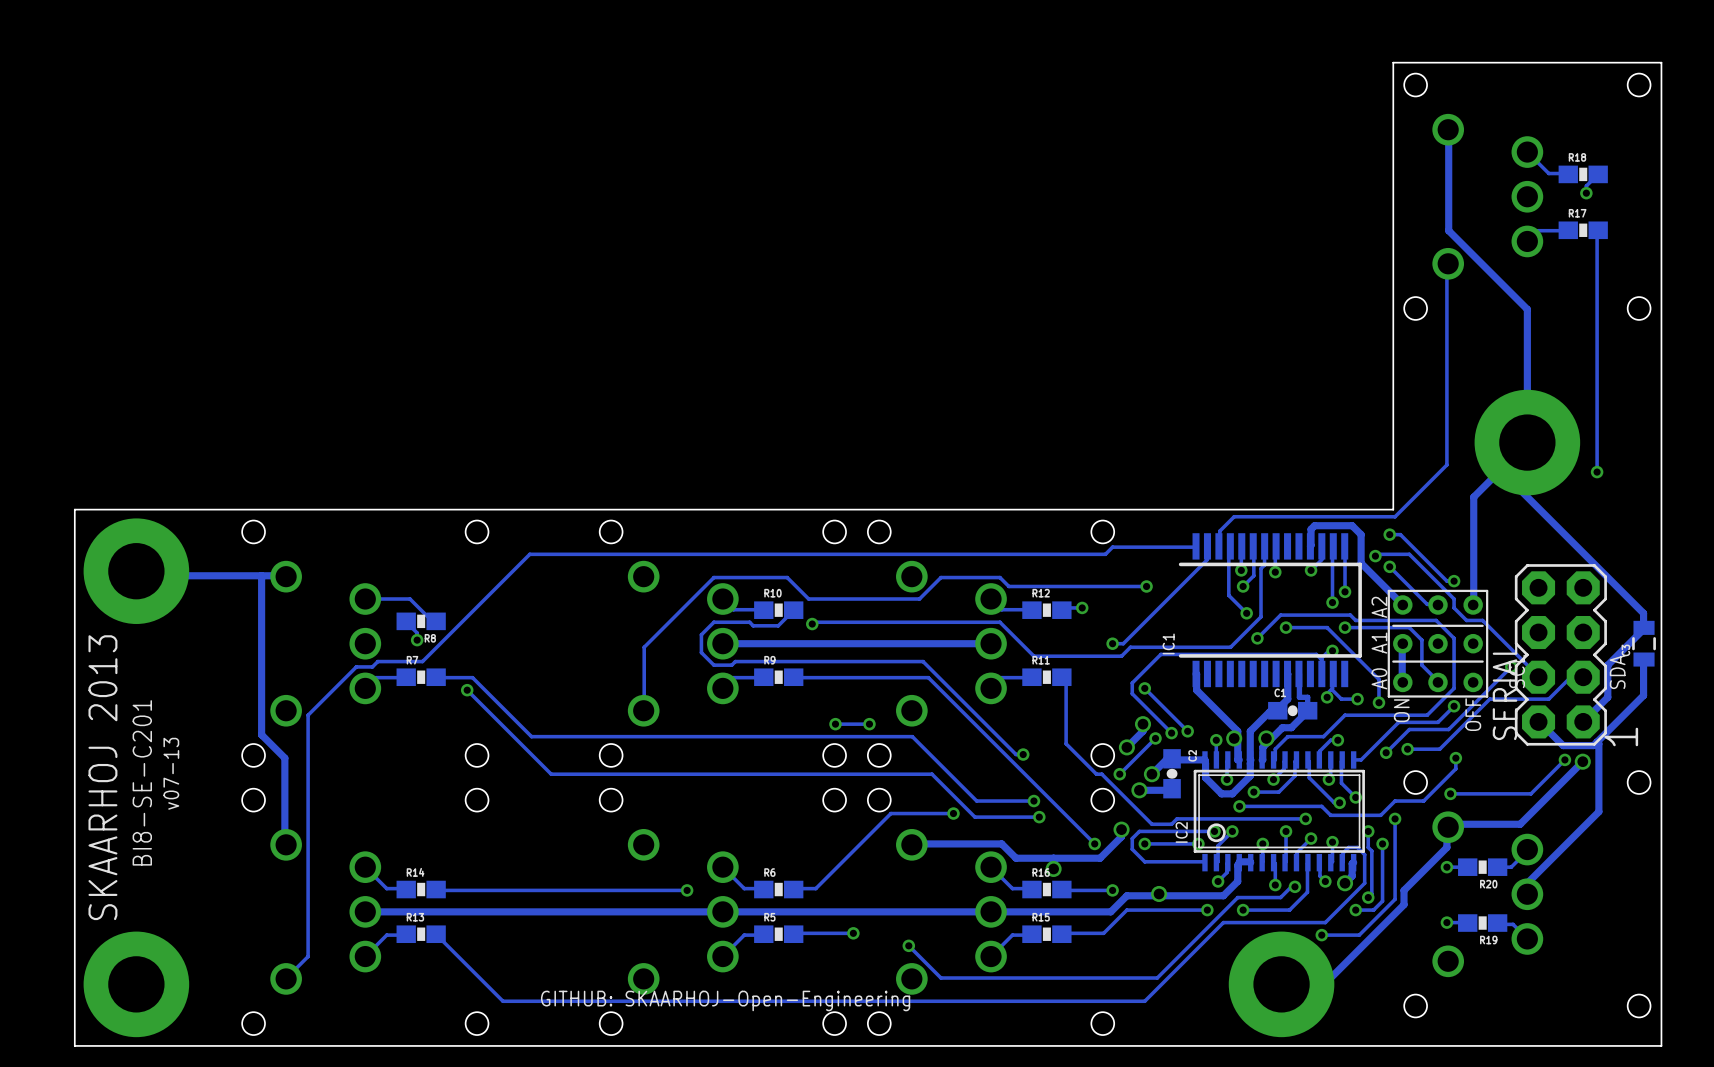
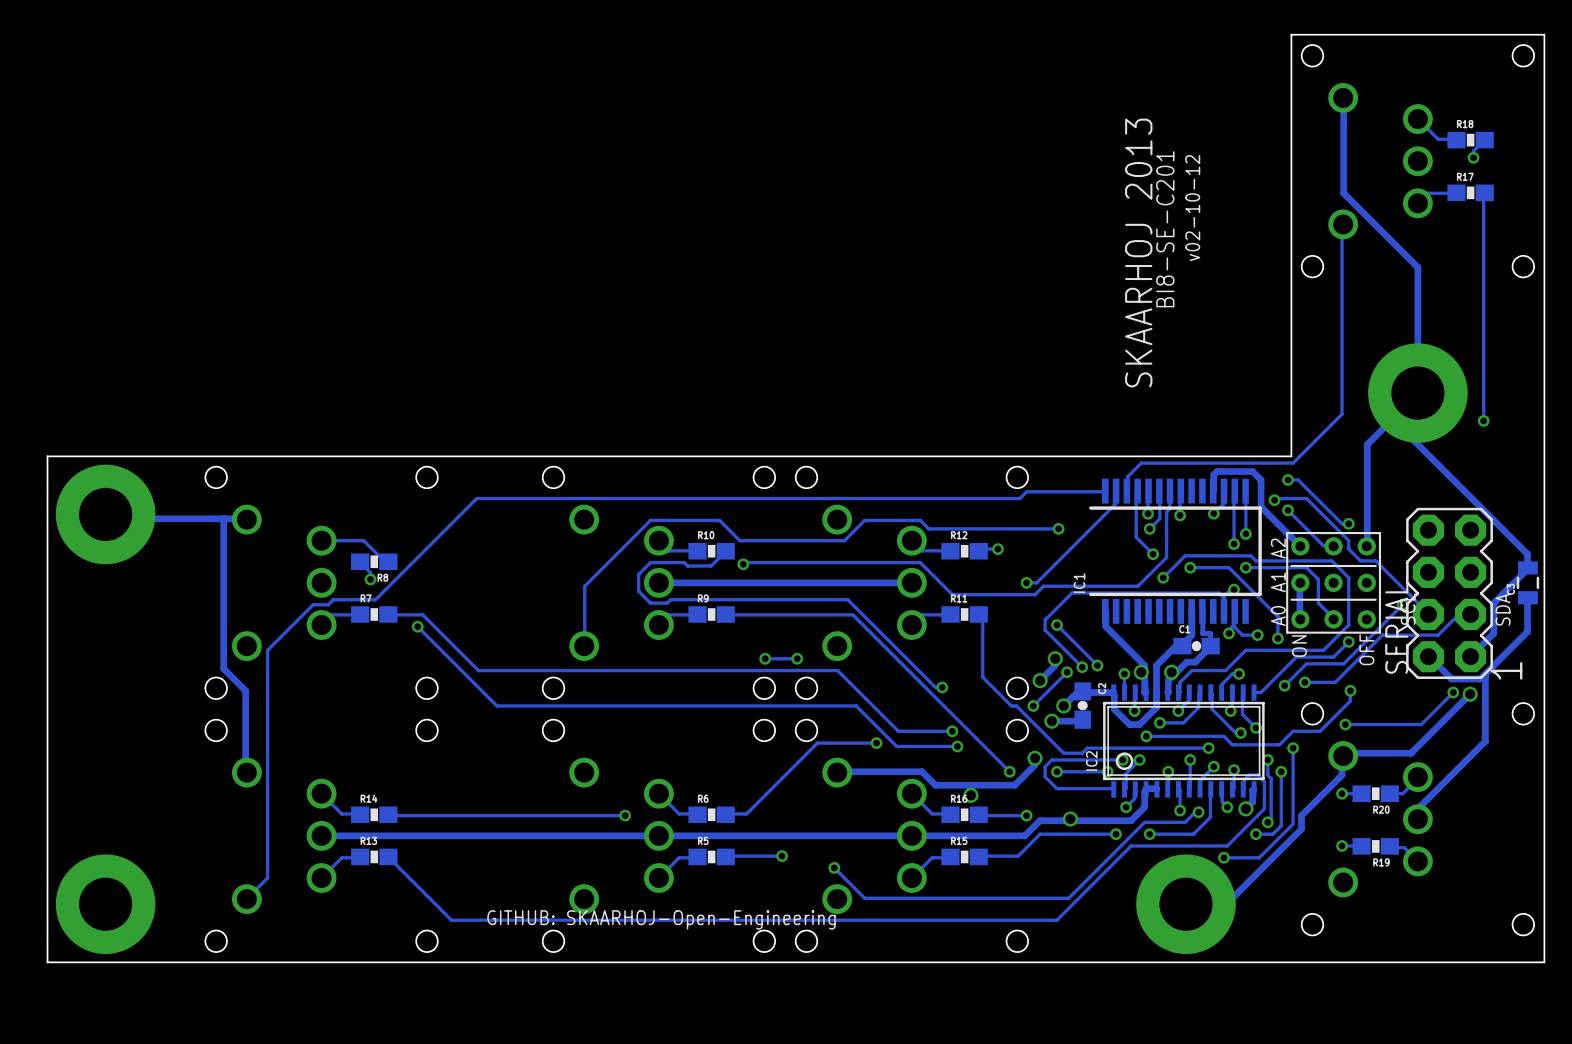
text: none -> v02-10-12 (1192, 208)
text: none -> BI8-SE-C201 (1165, 229)
text: none -> SKAARHOJ 2013 (1138, 253)
text: v07-13 (171, 773) -> none
text: SKAARHOJ 2013 (102, 777) -> none
text: BI8-SE-C201 (142, 782) -> none

